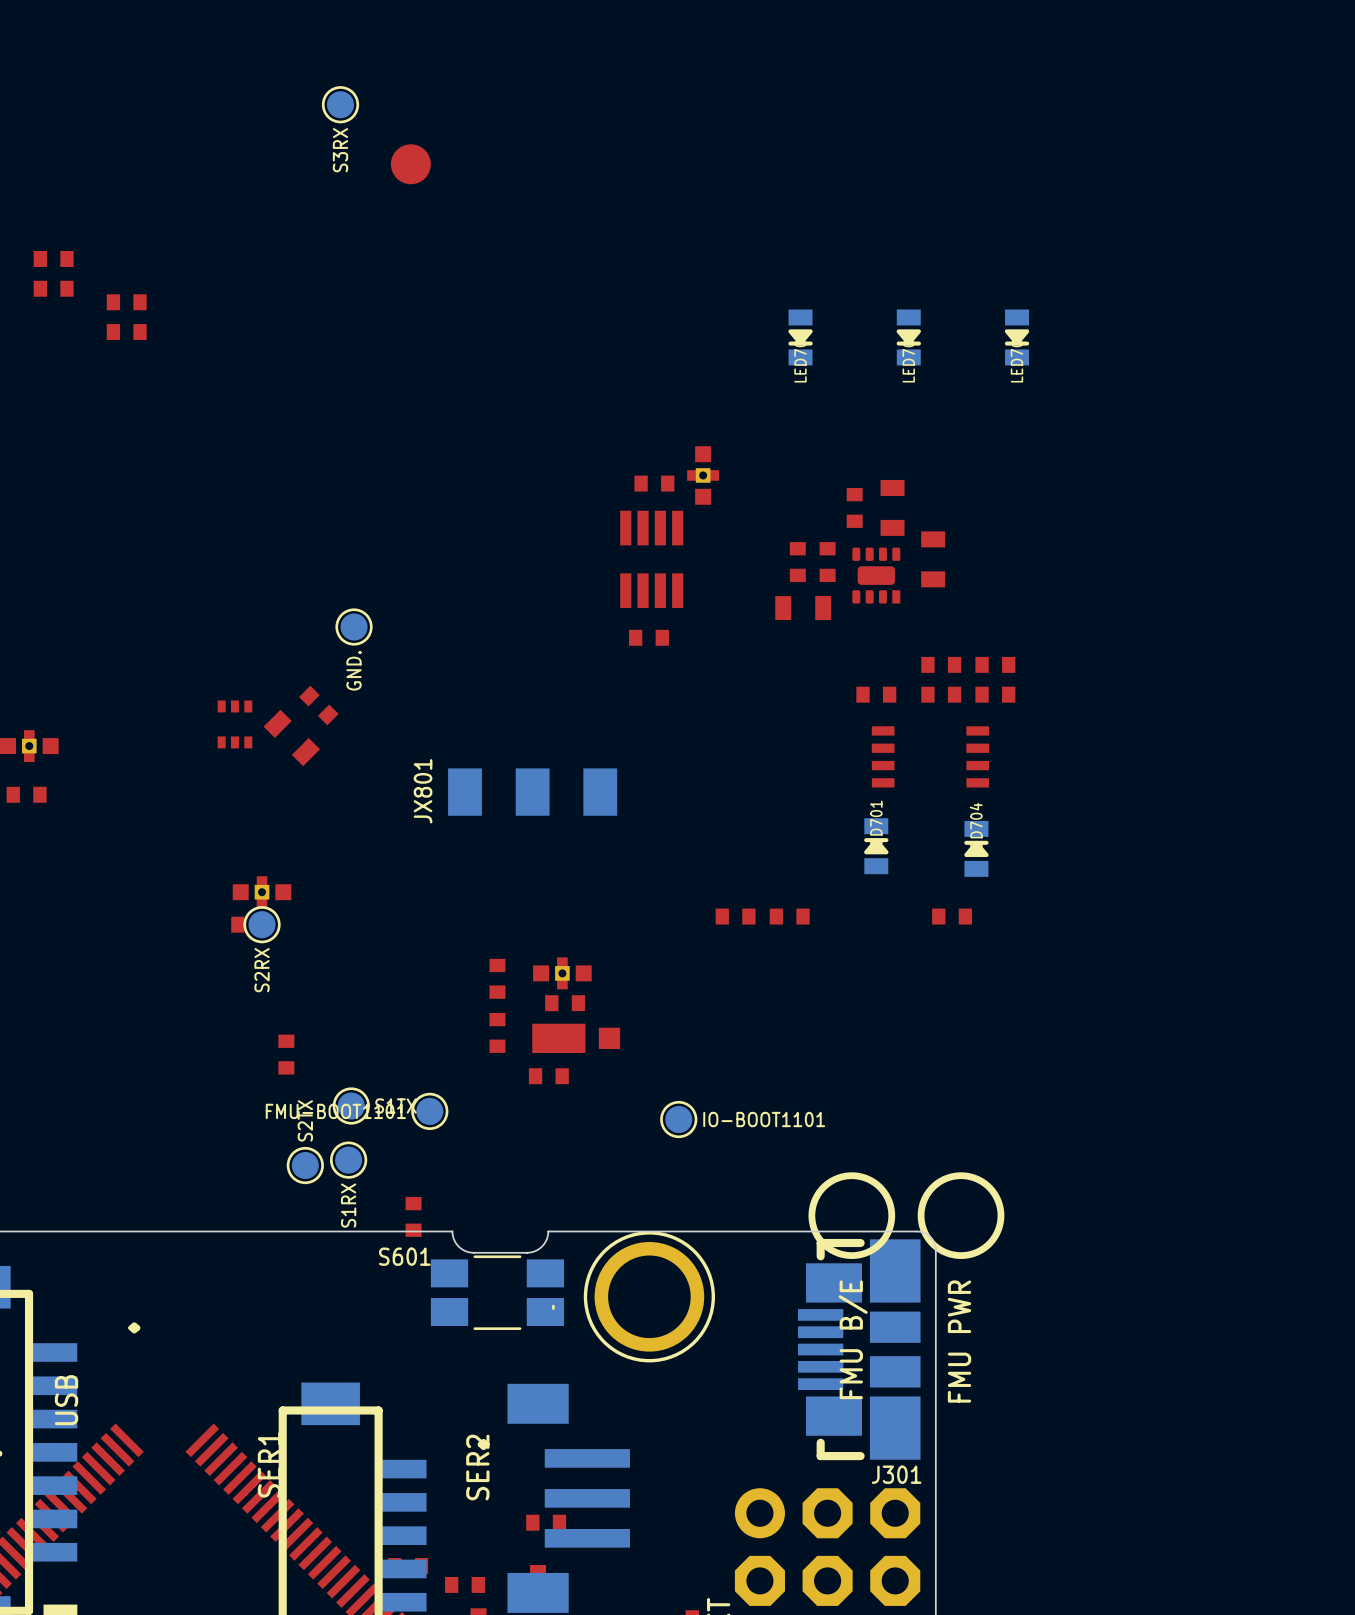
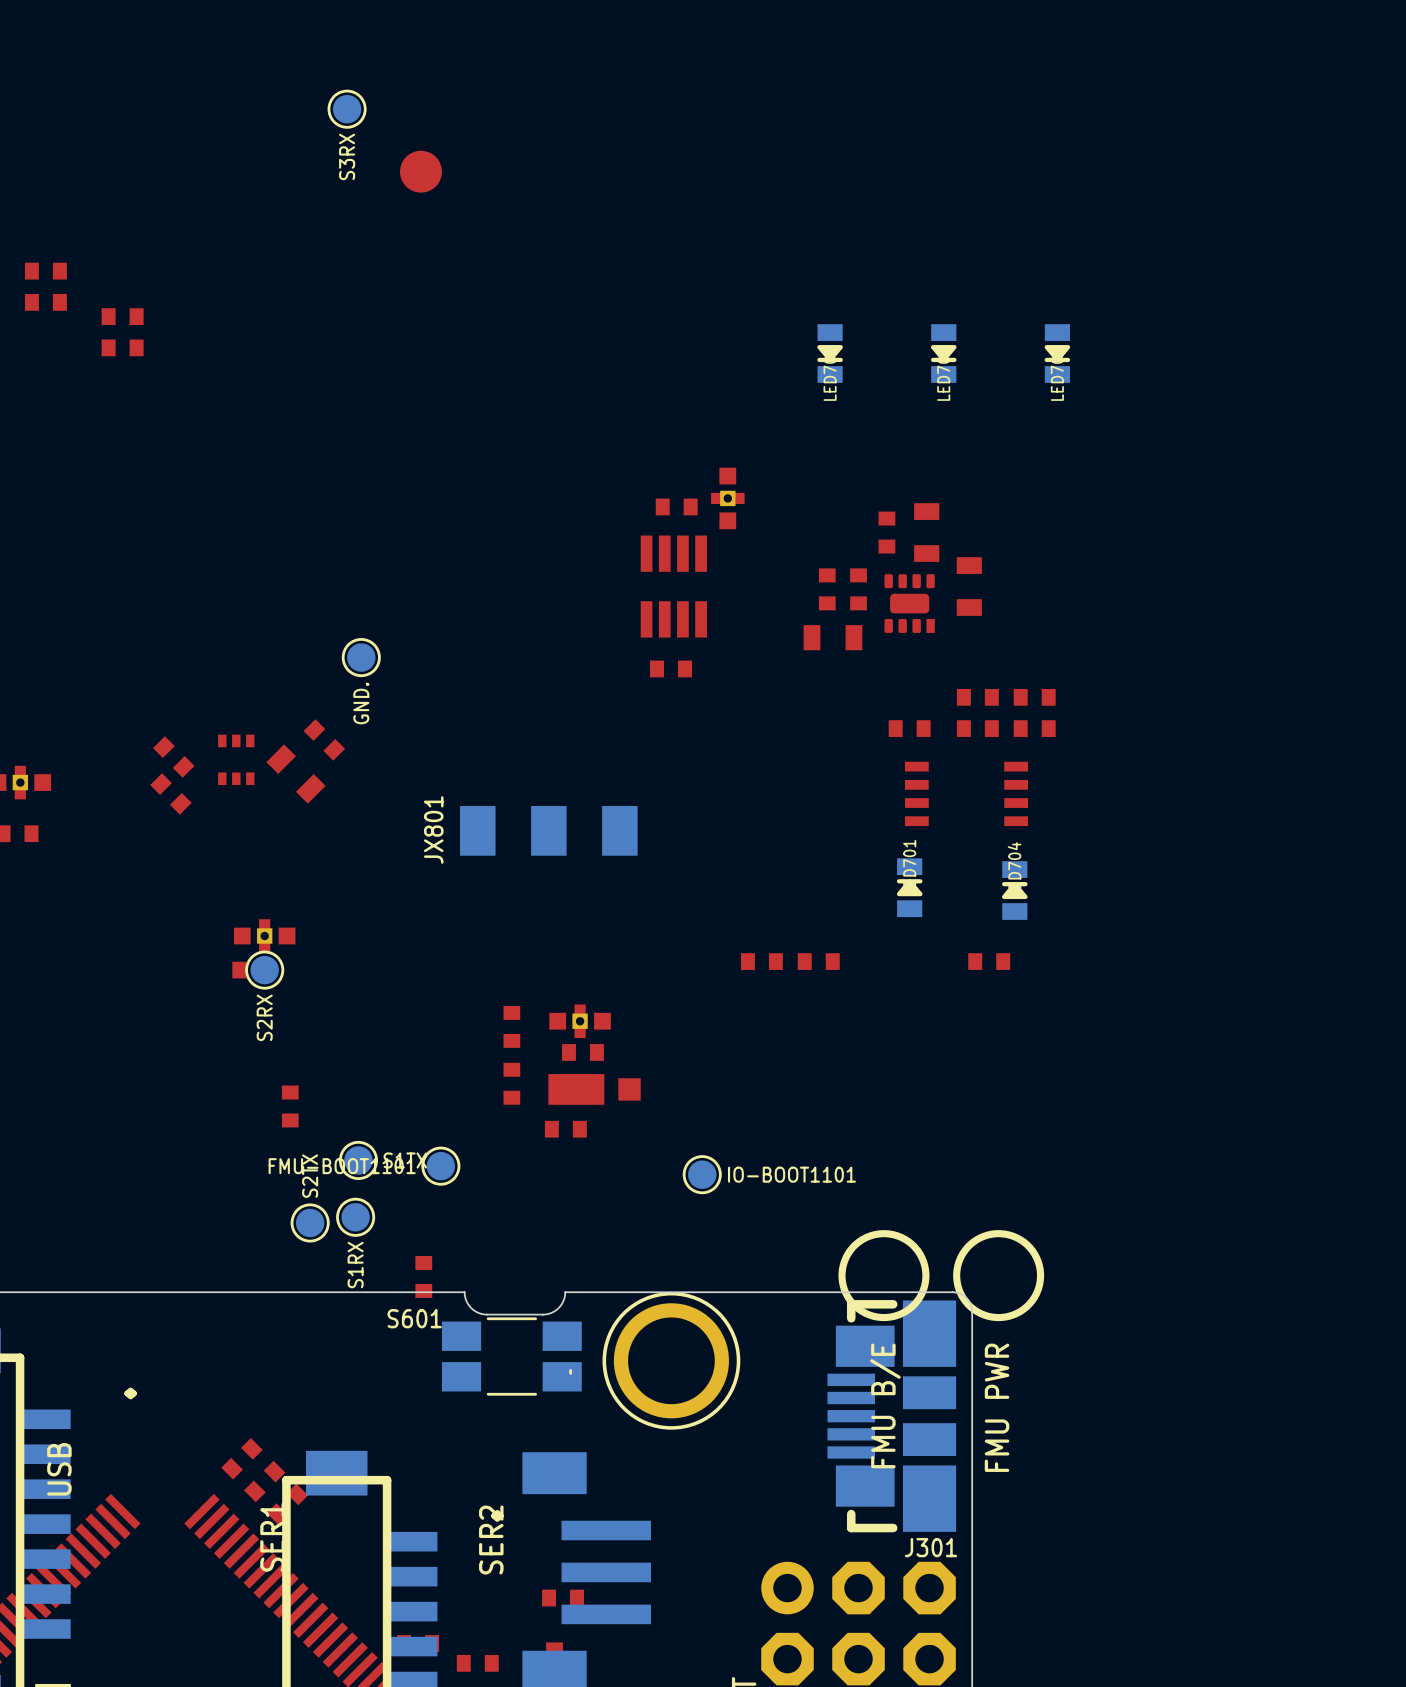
part: none -> (173, 757)
part: none -> (170, 793)
part: none -> (241, 1458)
part: none -> (264, 1481)
part: none -> (287, 1504)

